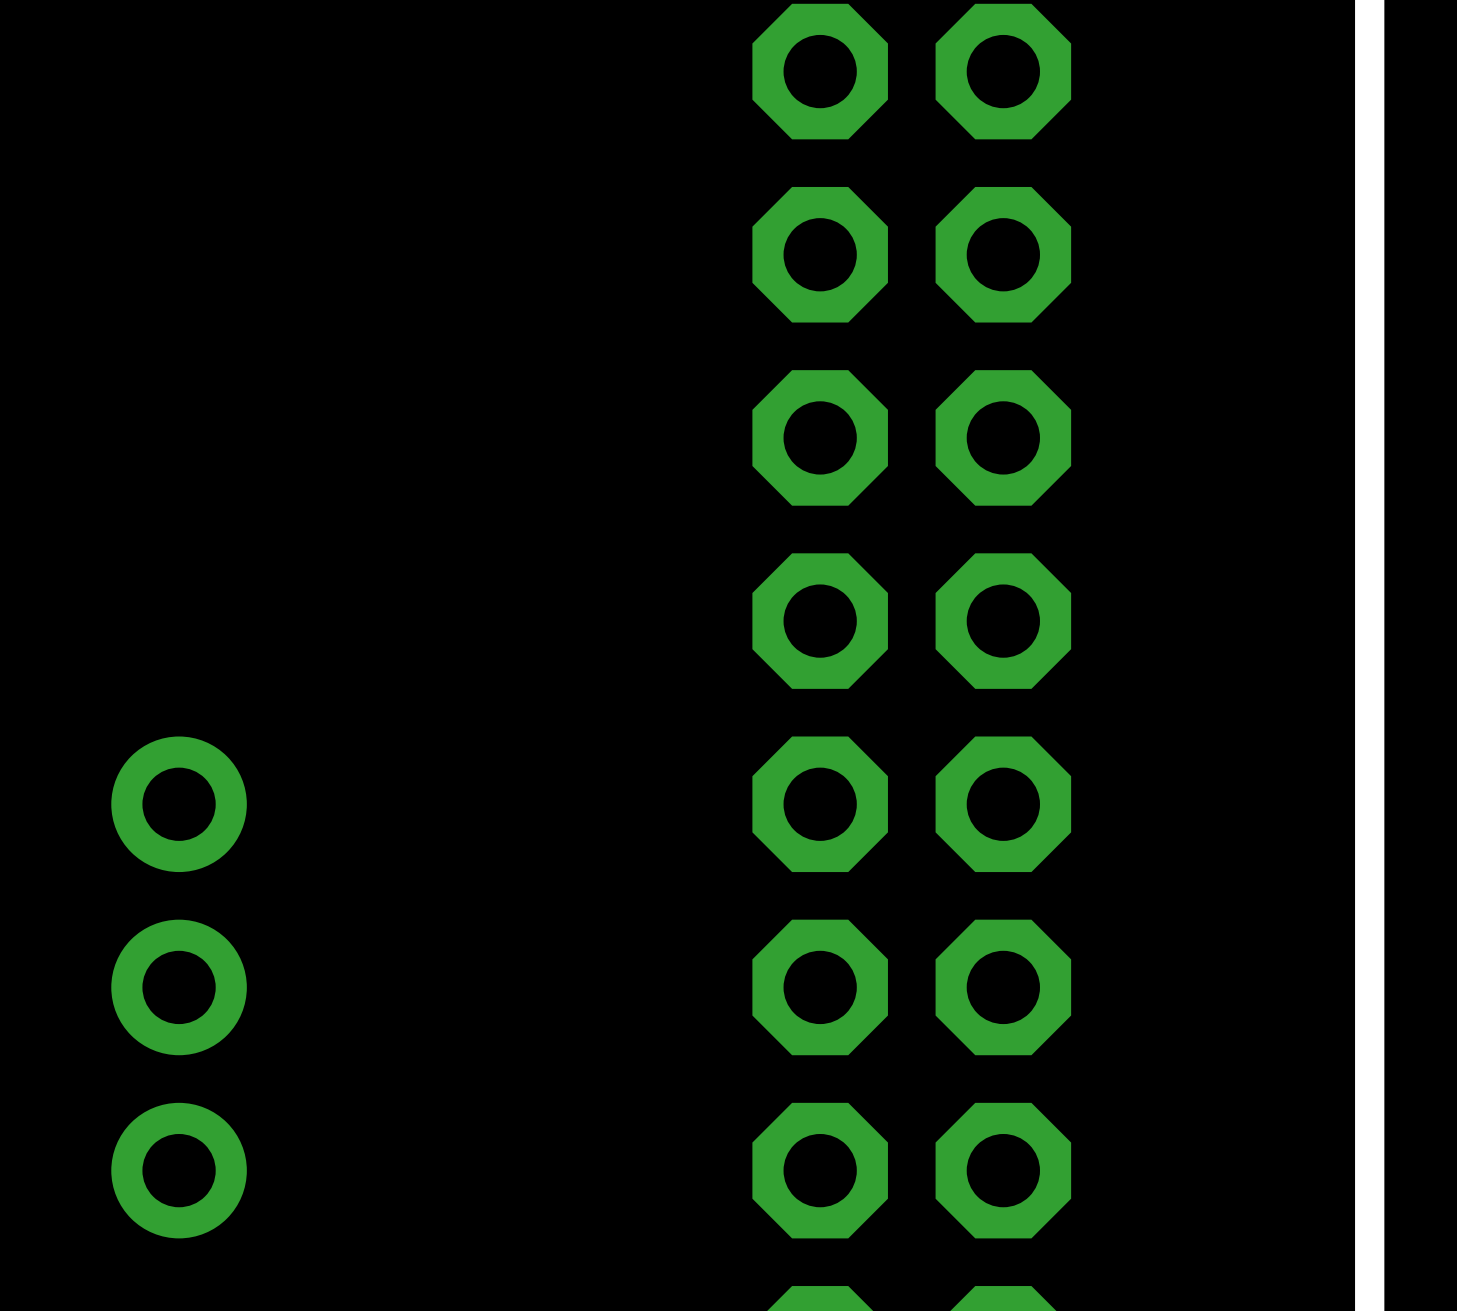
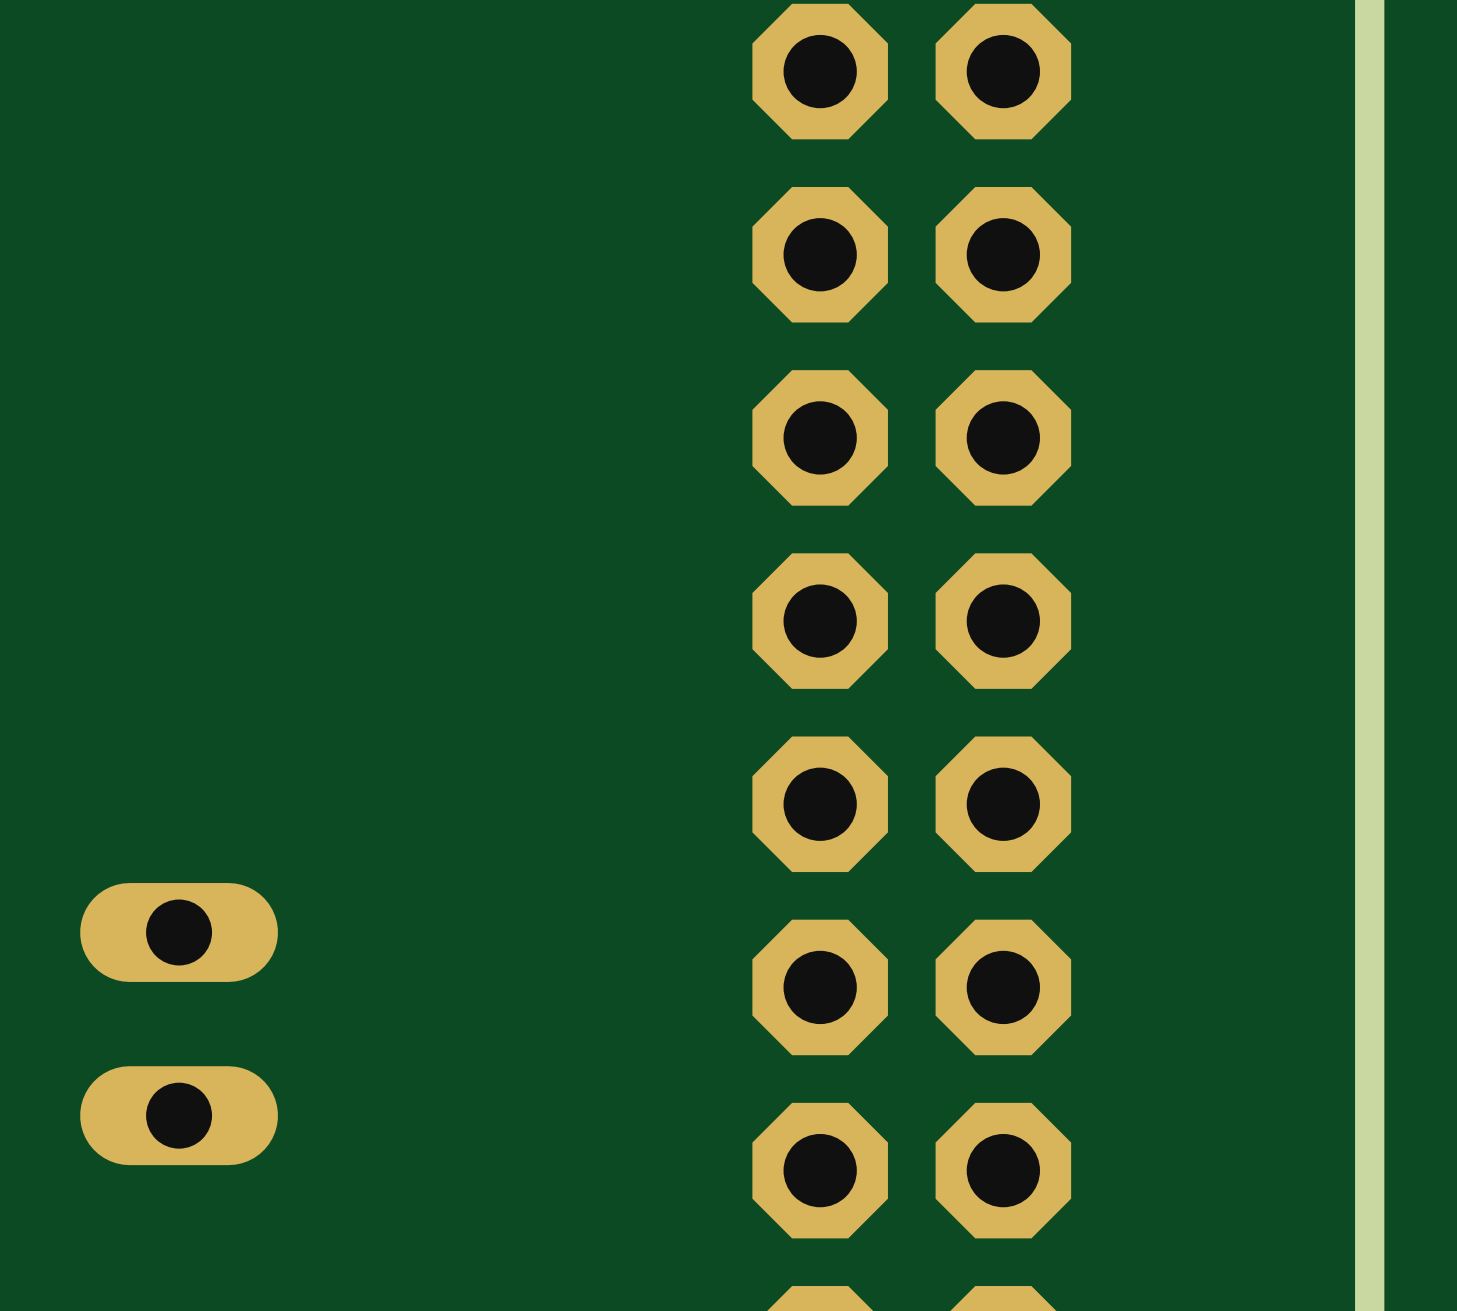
part footprint: [111, 736, 247, 1239] -> [80, 883, 278, 1166]

